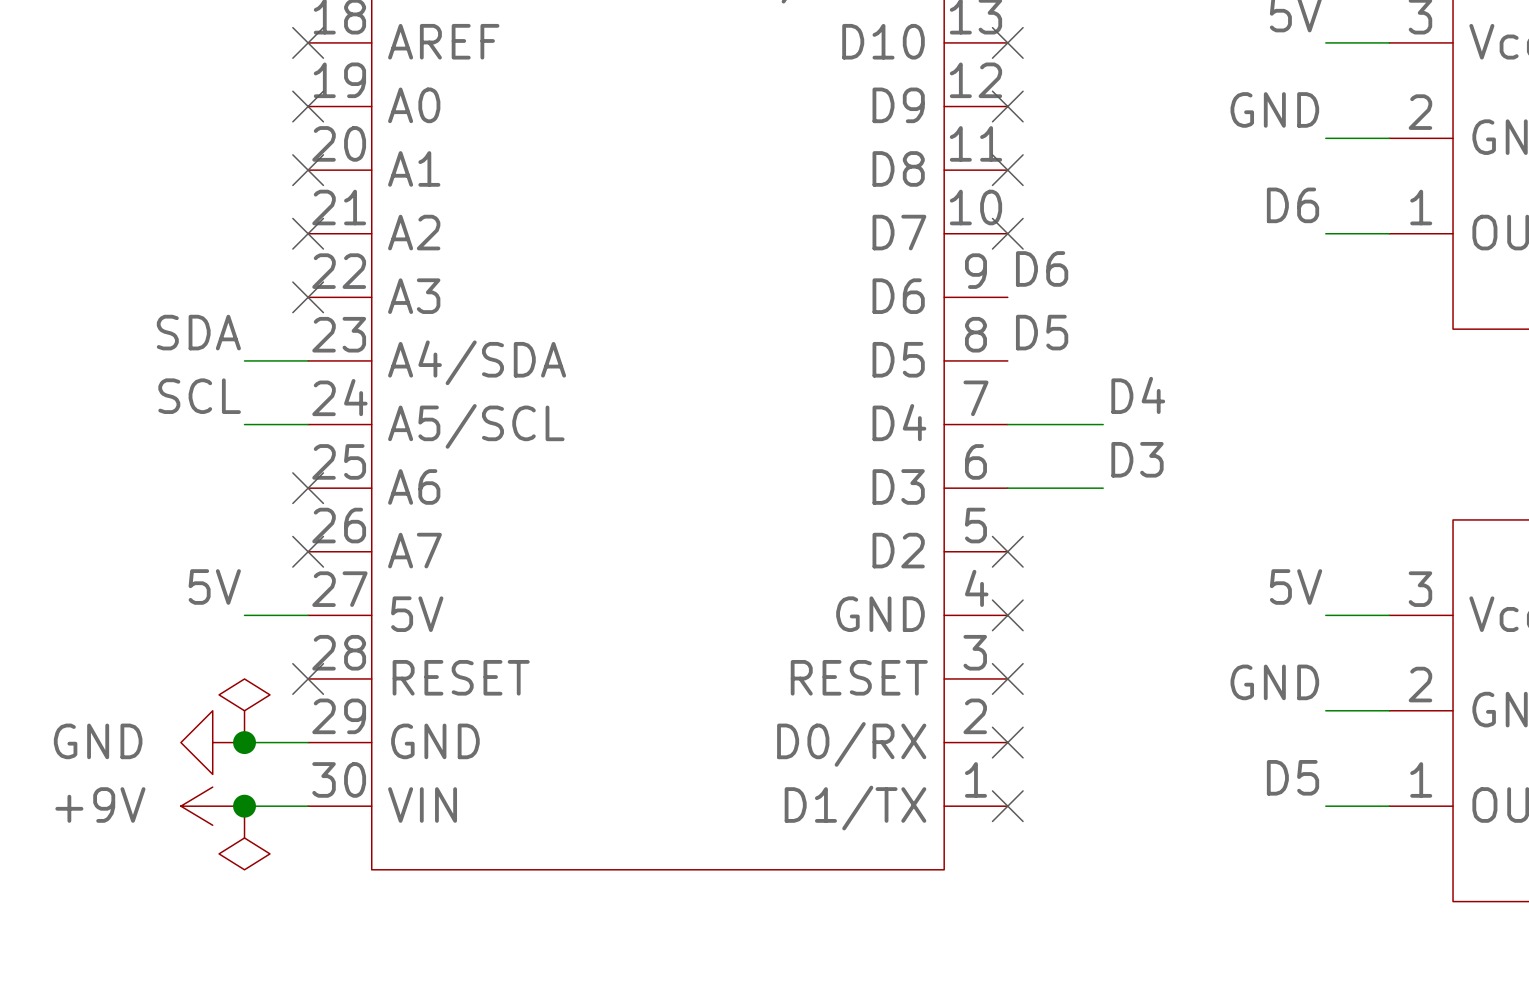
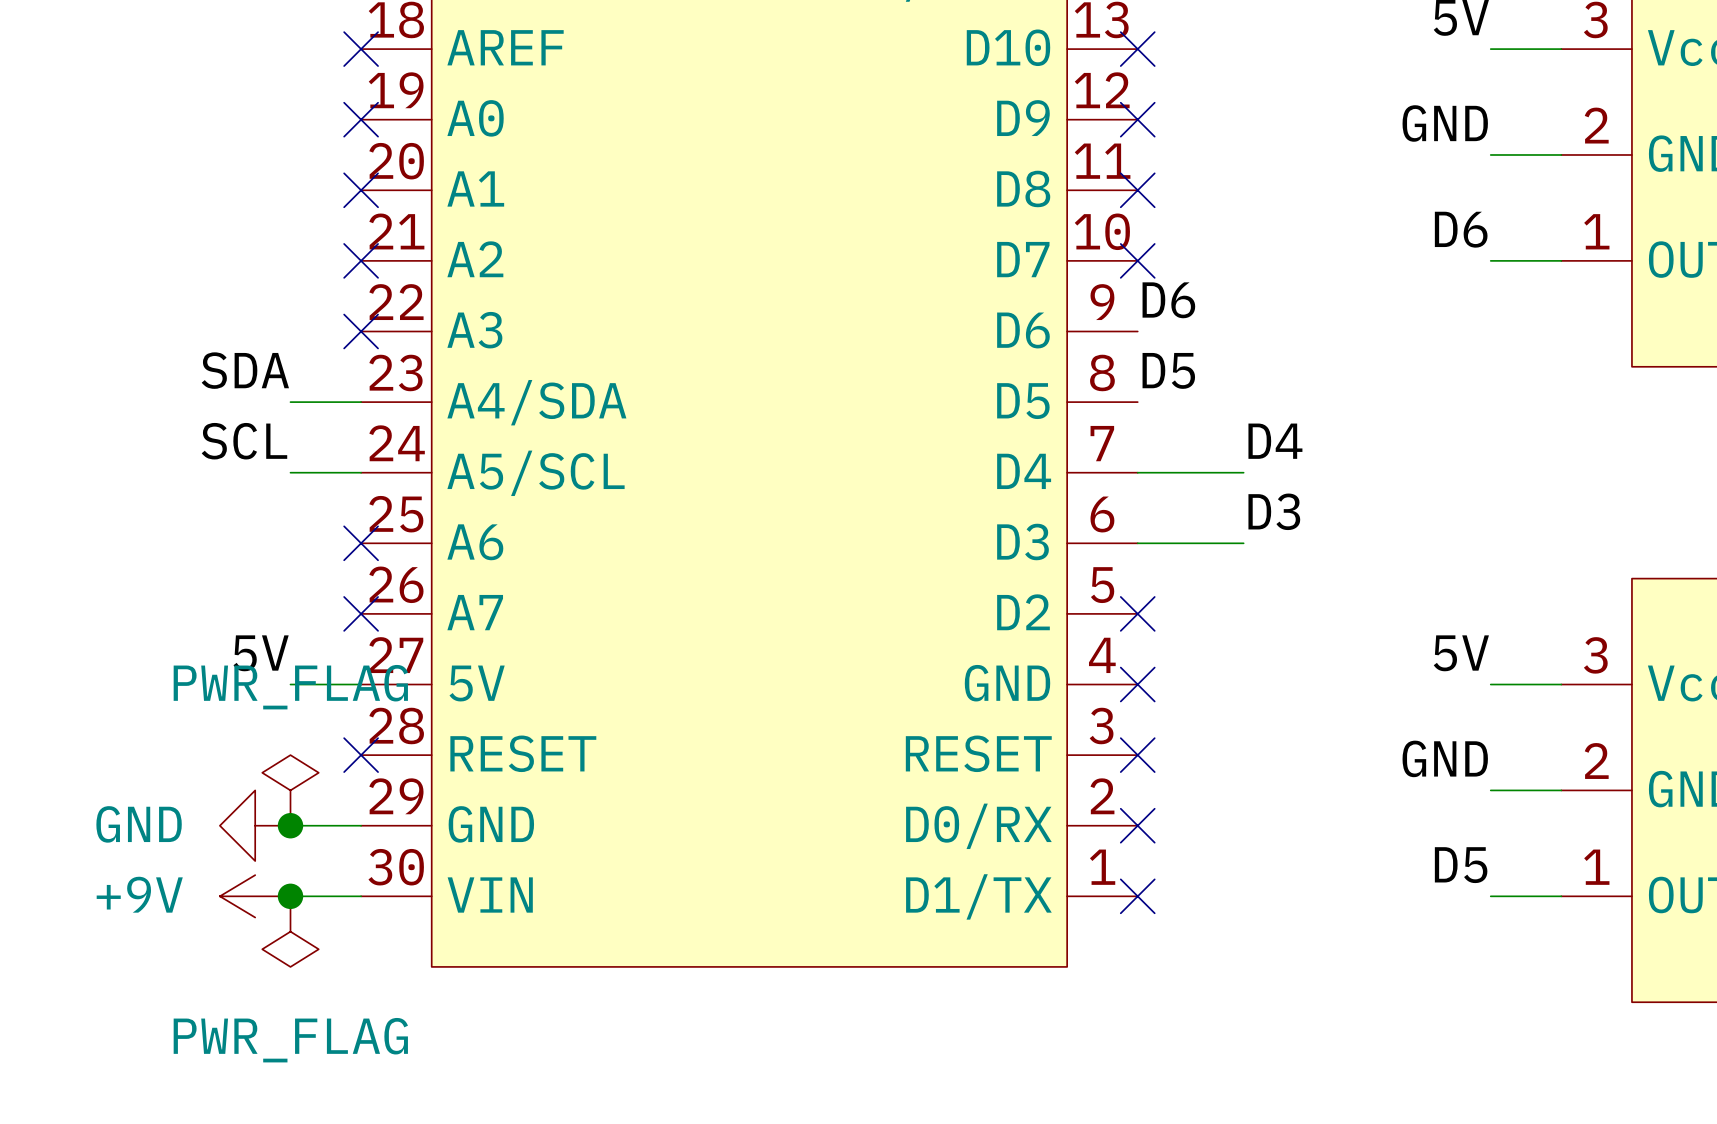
power symbol text: none -> PWR_FLAG (290, 687)
power symbol text: none -> PWR_FLAG (290, 1040)

